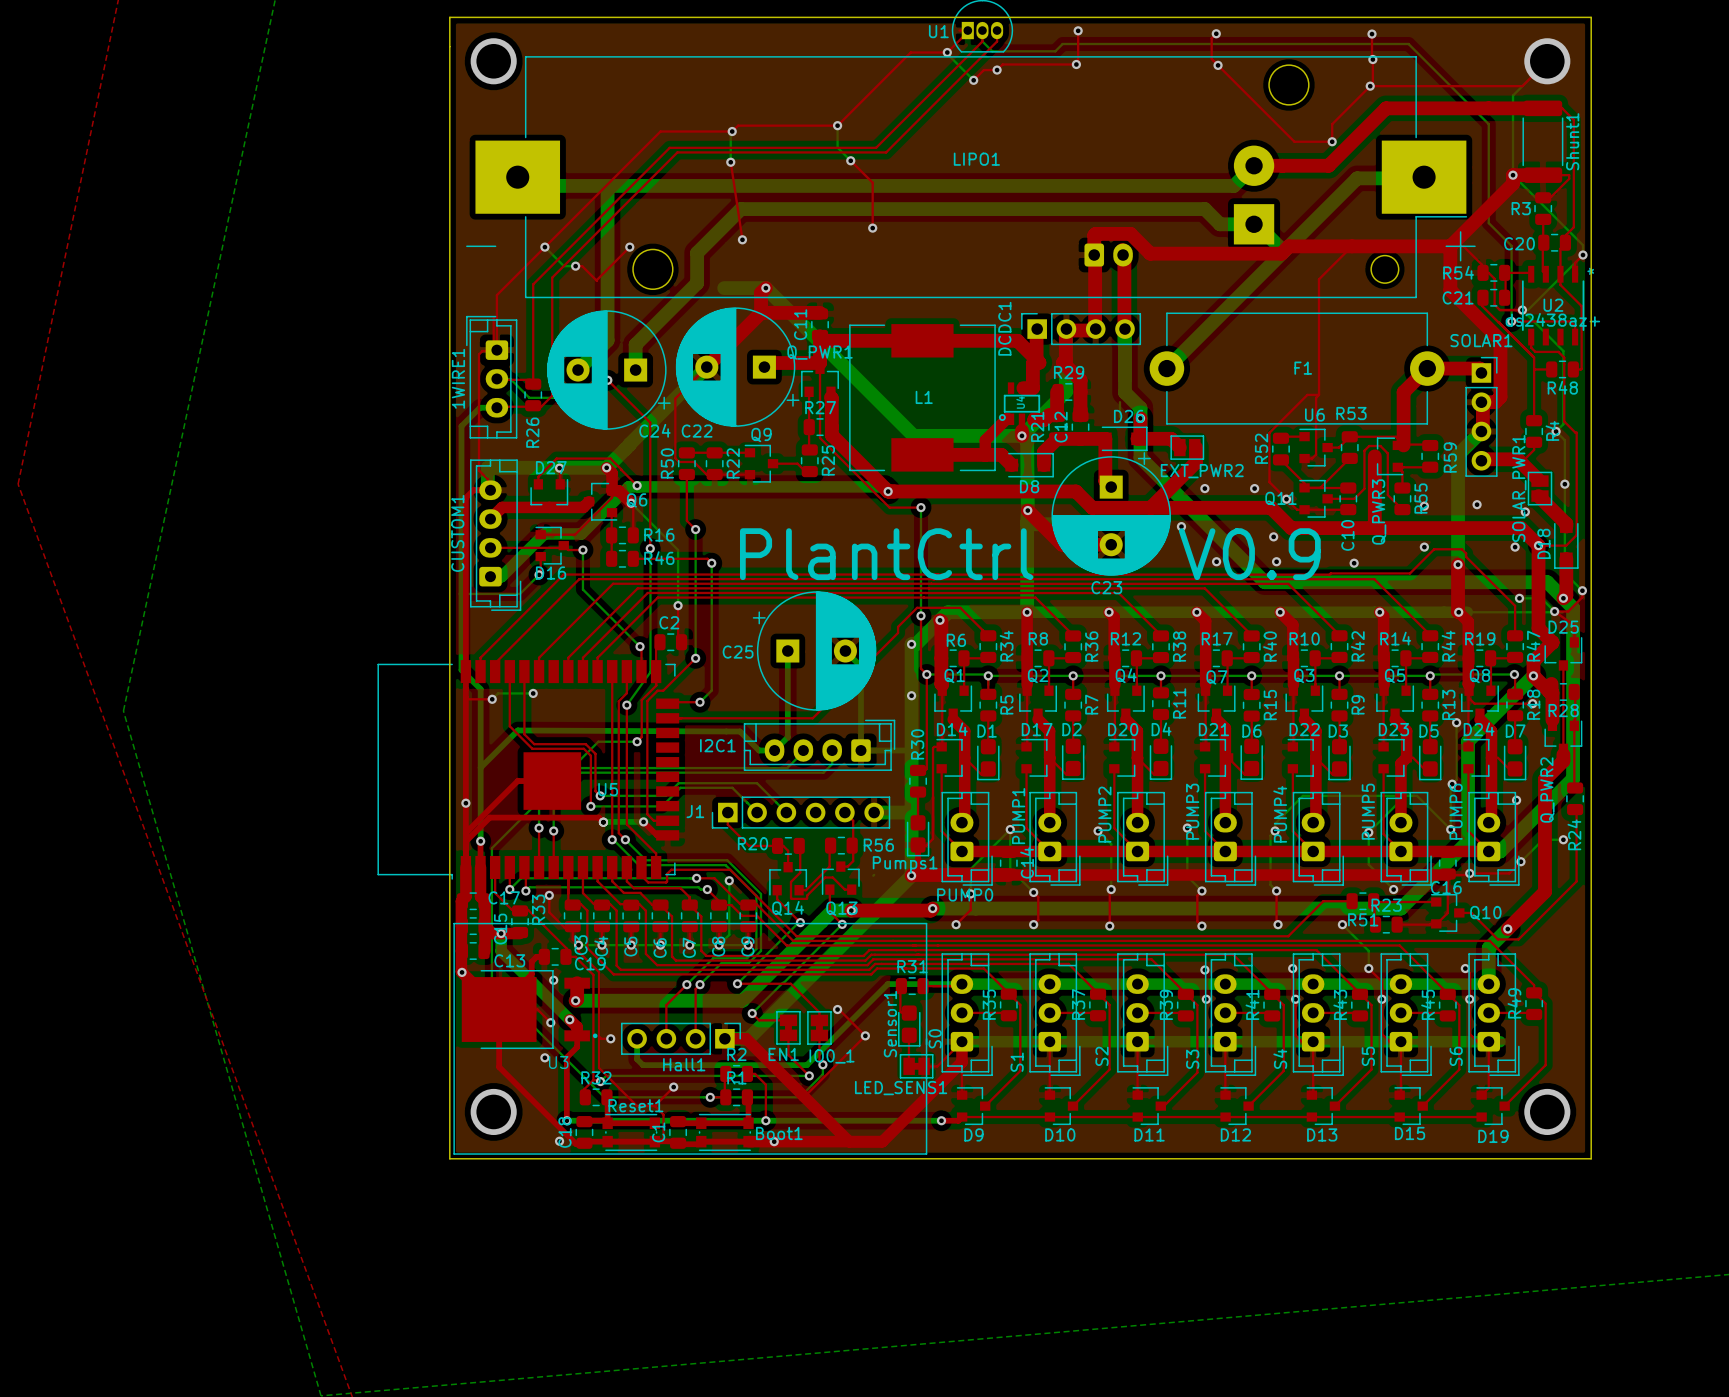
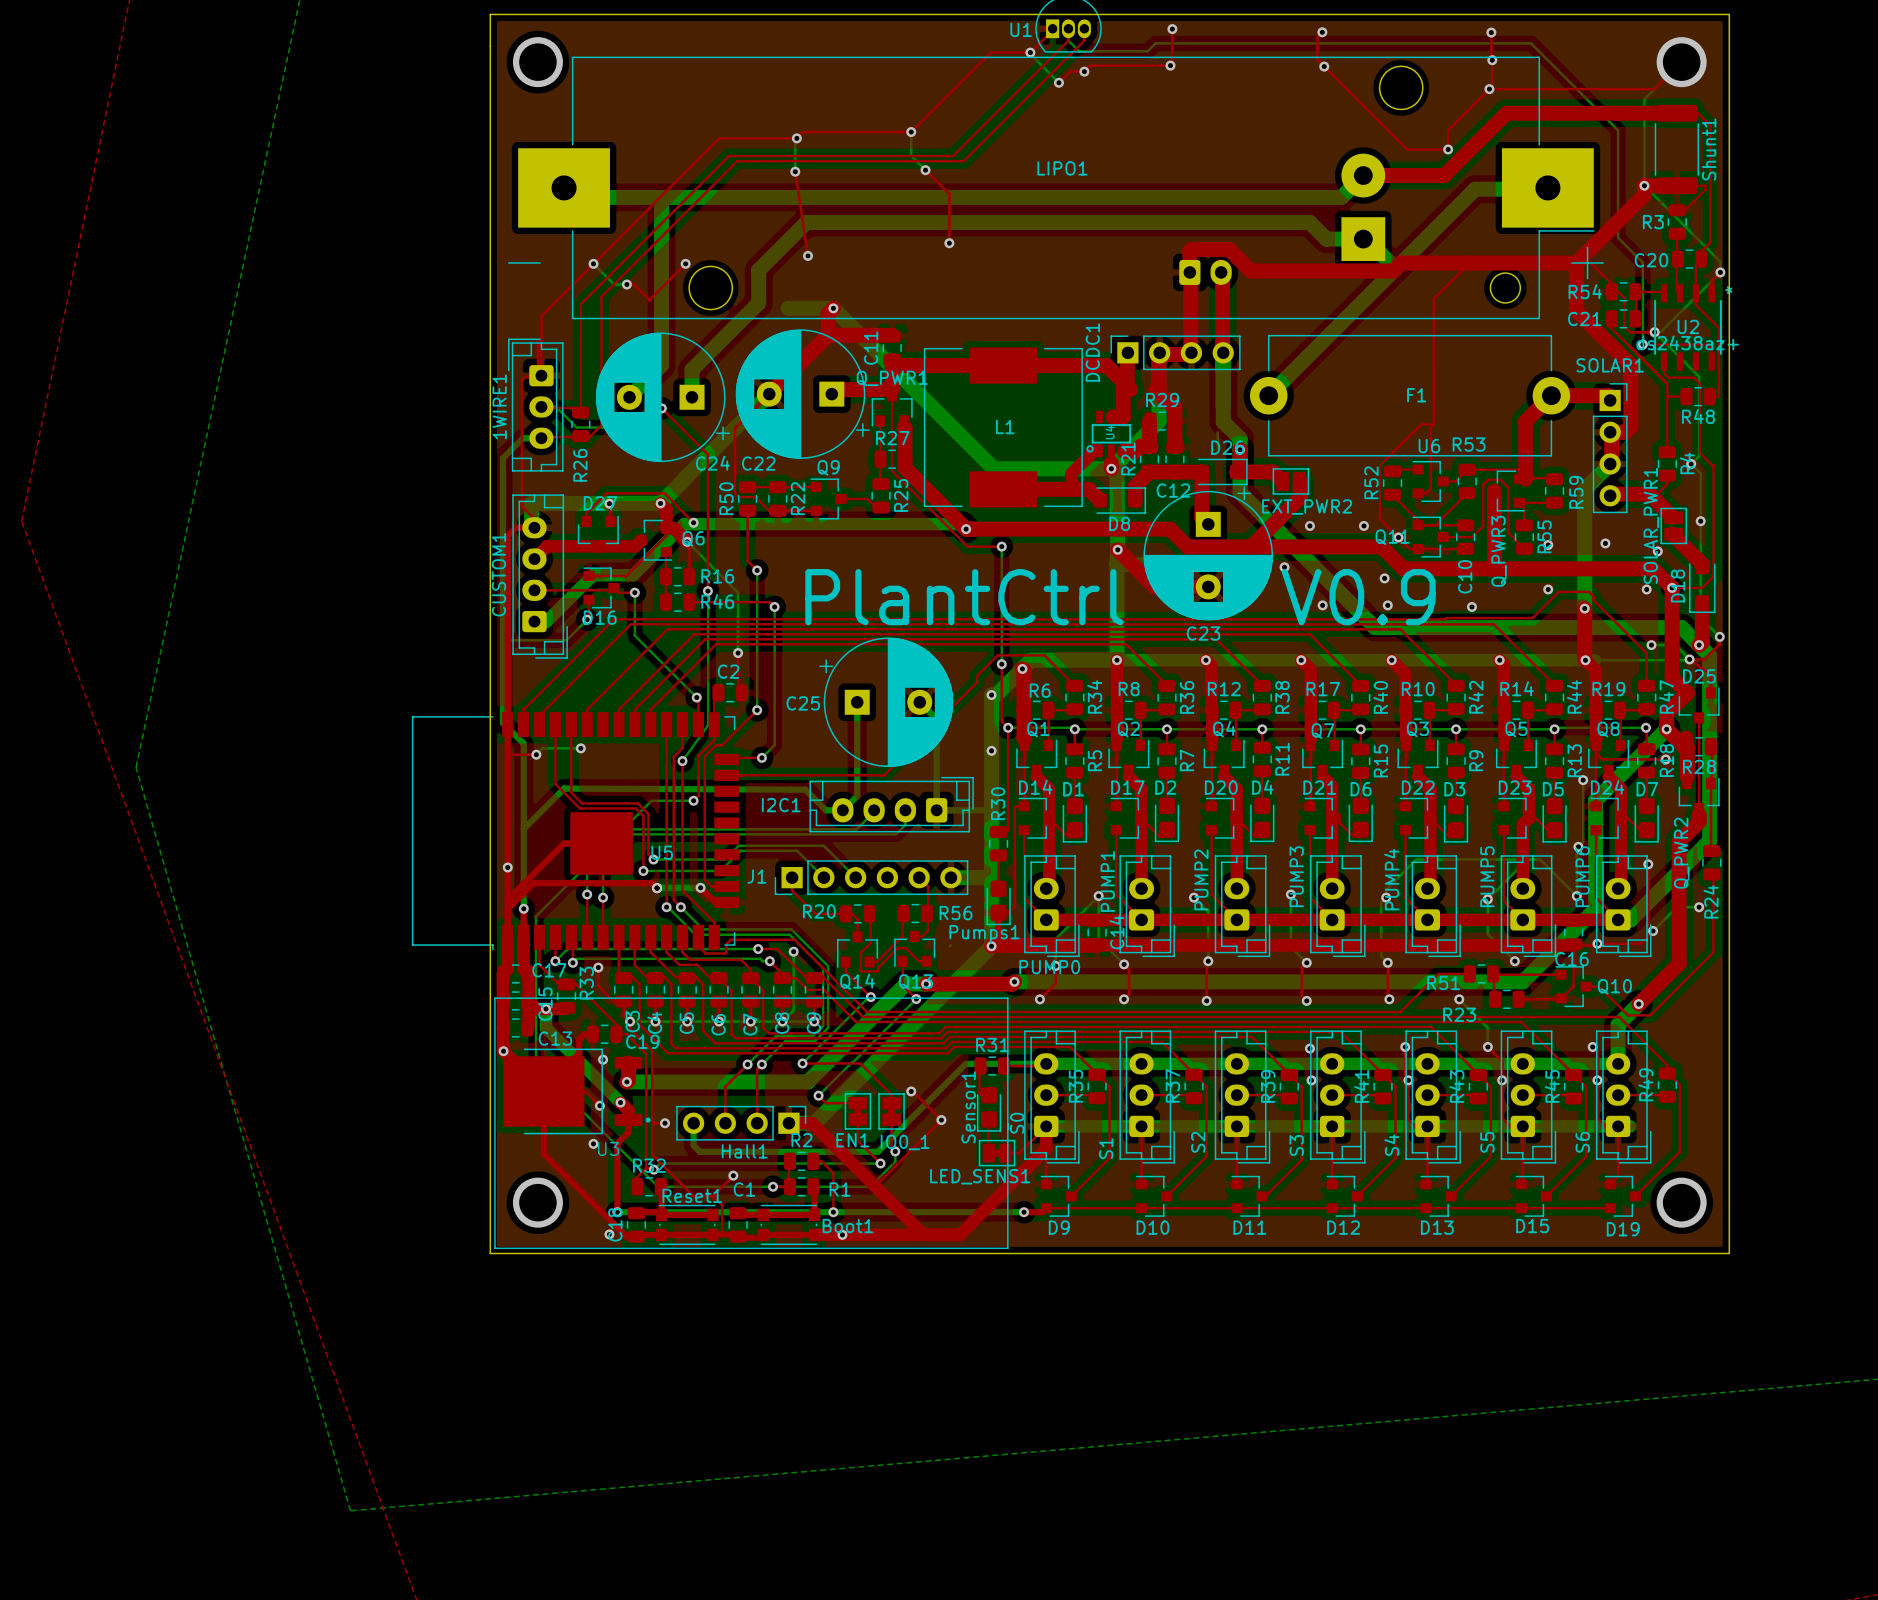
C12 name rotation: 0° (1061, 427) -> 90° clockwise (1173, 490)
R23 name position: R23 (1386, 905) -> R23 (1459, 1014)
R51 name position: R51 (1363, 919) -> R51 (1443, 982)
R1 name position: R1 (736, 1077) -> R1 (840, 1189)
C1 name rotation: 0° (658, 1132) -> 90° clockwise (744, 1189)
C1 name position: C1 (658, 1132) -> C1 (744, 1189)

